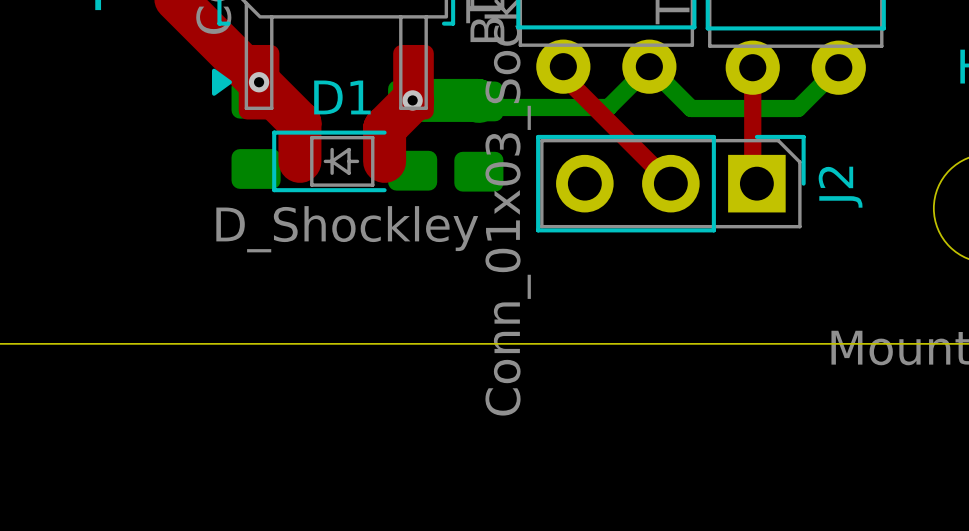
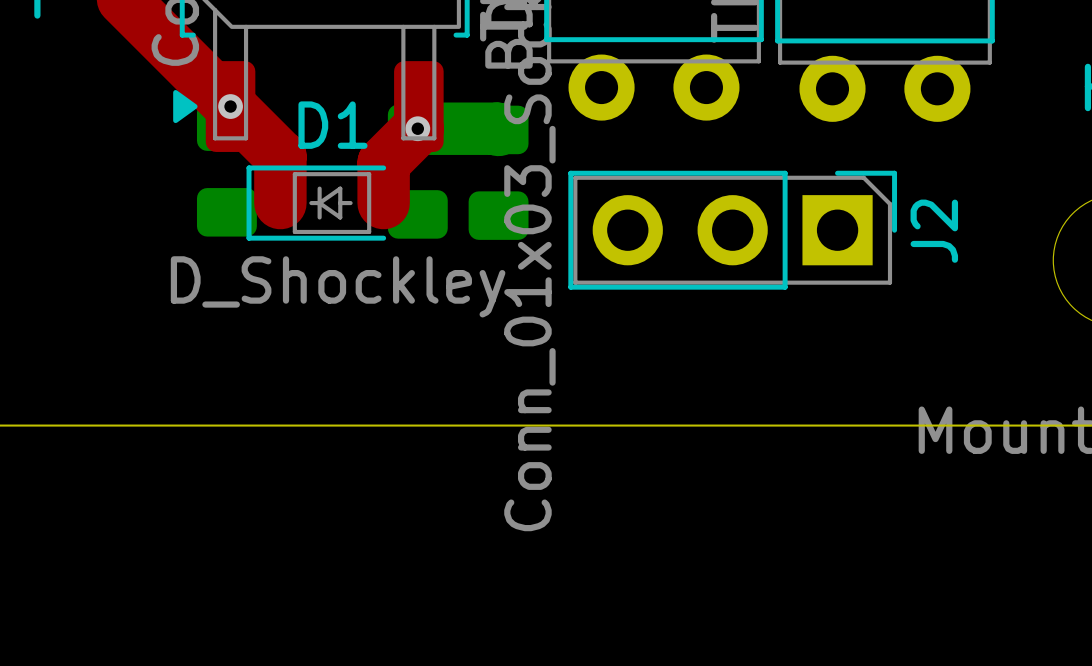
top track: (563, 66) (563, 76) (670, 183) -> none
top track: (752, 67) (752, 179) (756, 183) -> none
bottom track: (838, 67) (797, 108) (691, 108) (649, 66) (608, 107) (484, 107) (478, 101) -> none

